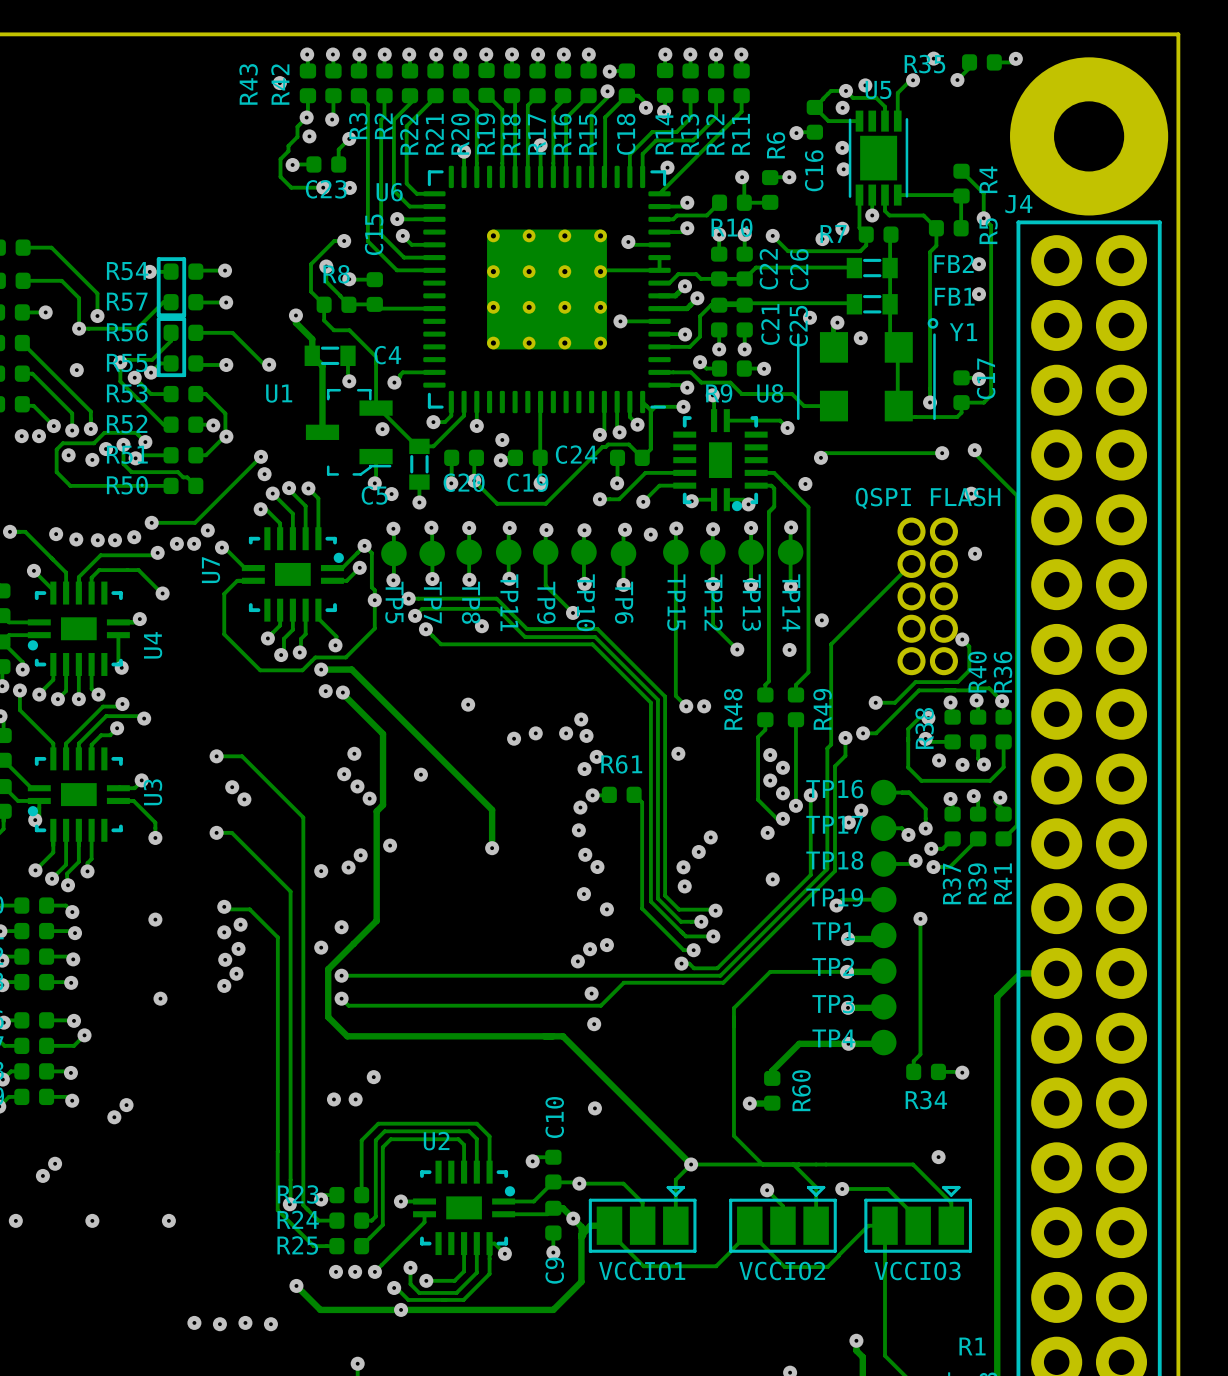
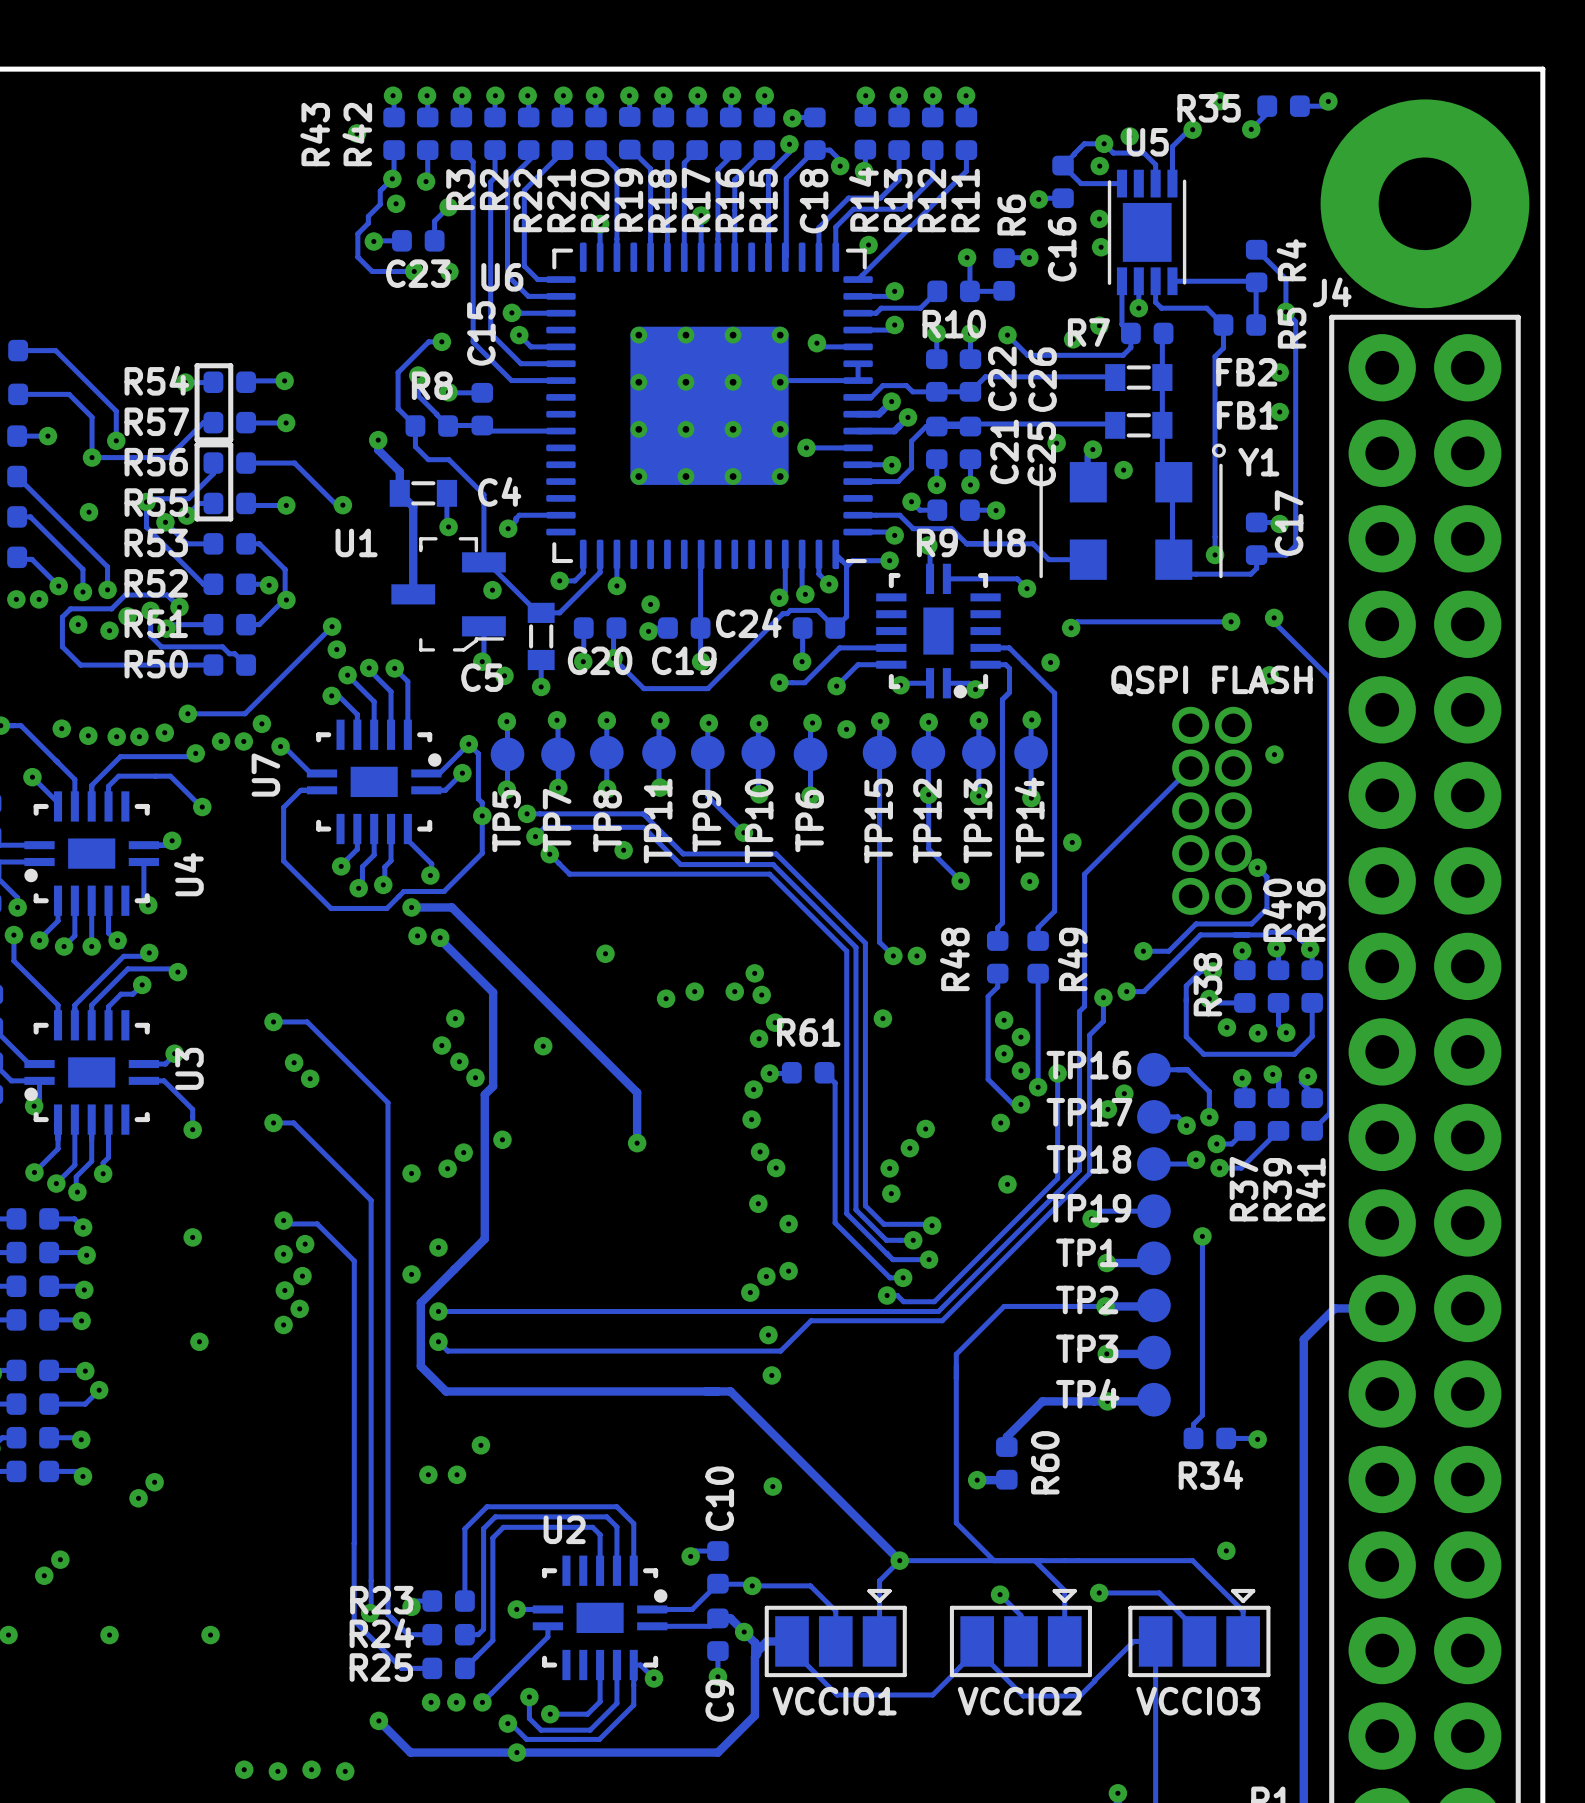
TP5 name rotation: 0° (394, 602) -> 180° (506, 821)
TP7 name rotation: 0° (432, 602) -> 180° (557, 820)
TP8 name rotation: 0° (471, 602) -> 180° (607, 821)
TP11 name rotation: 0° (509, 602) -> 180° (658, 821)
TP9 name rotation: 0° (546, 602) -> 180° (706, 821)
TP10 name rotation: 0° (585, 602) -> 180° (759, 821)
TP6 name rotation: 0° (624, 602) -> 180° (809, 821)
TP15 name rotation: 0° (676, 602) -> 180° (878, 821)
TP12 name rotation: 0° (713, 602) -> 180° (927, 821)
TP13 name rotation: 0° (751, 602) -> 180° (977, 821)
TP14 name rotation: 0° (791, 602) -> 180° (1029, 820)

